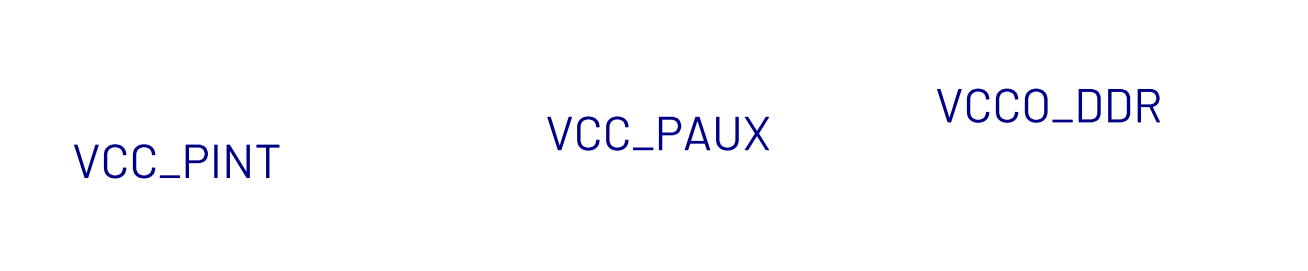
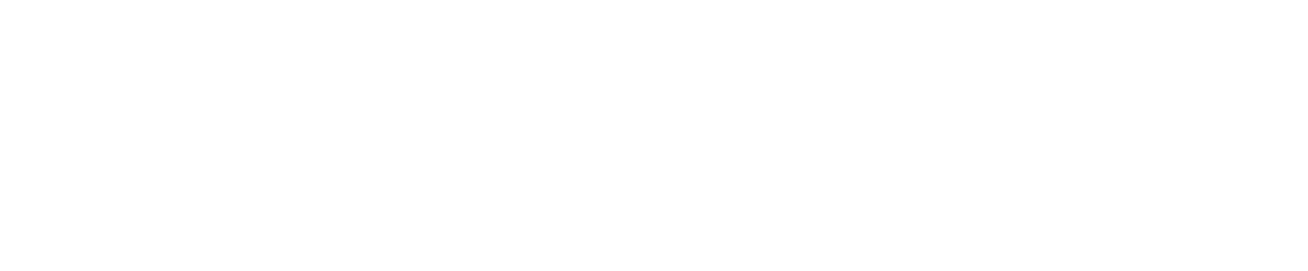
text: VCCO_DDR (1048, 105) -> none
text: VCC_PAUX (658, 133) -> none
text: VCC_PINT (176, 161) -> none

